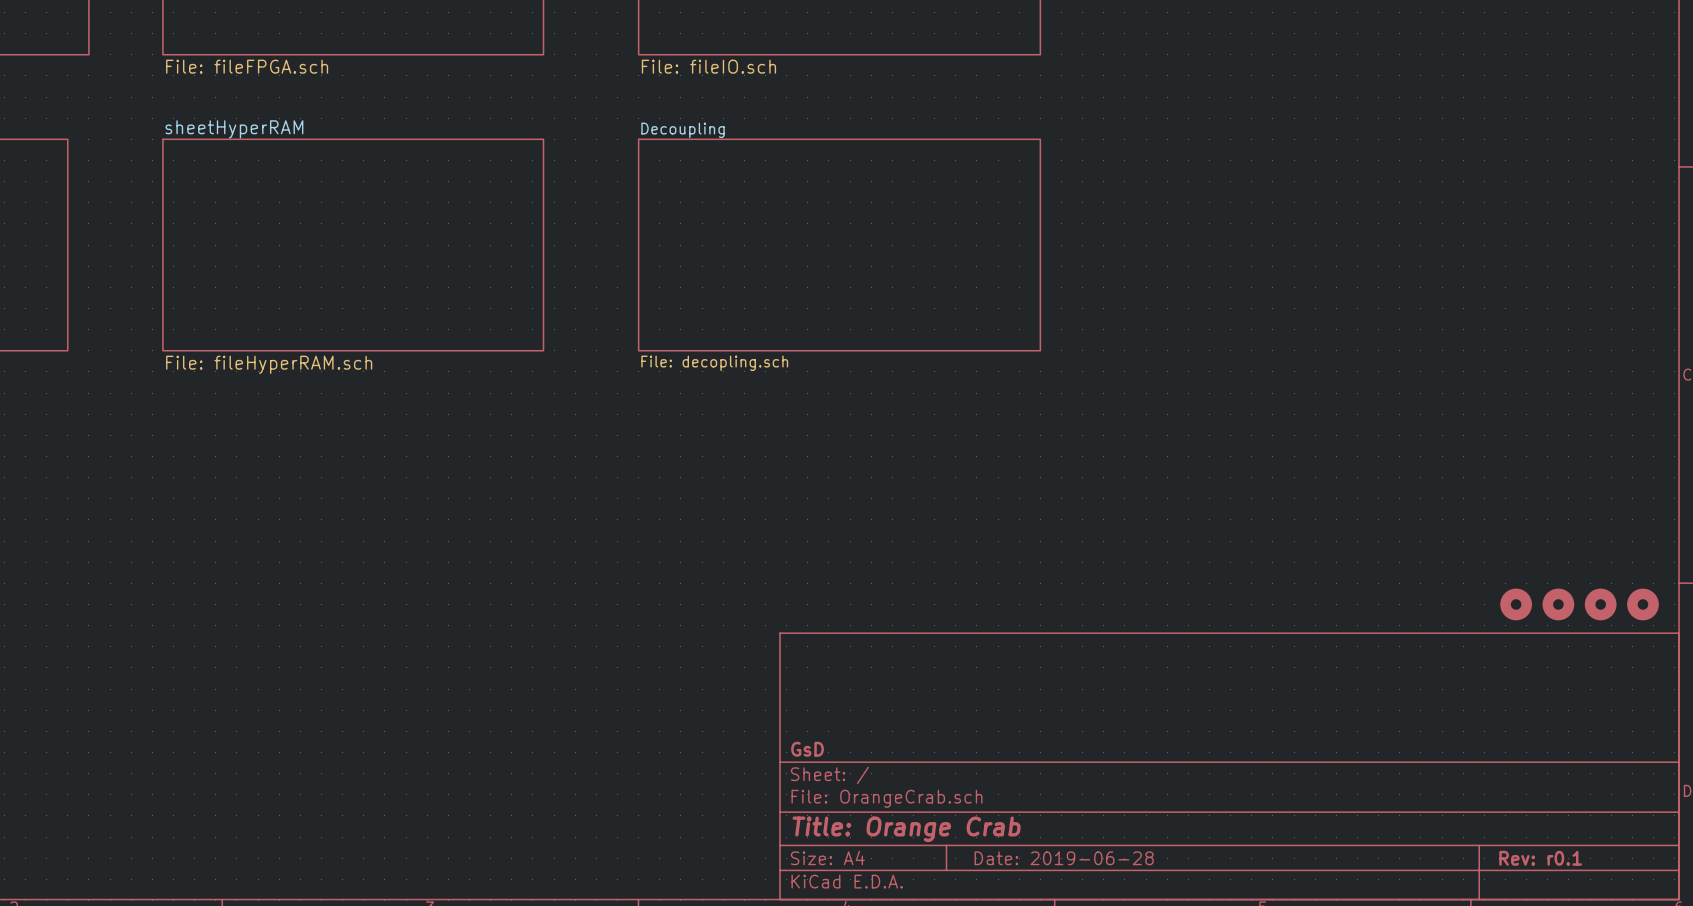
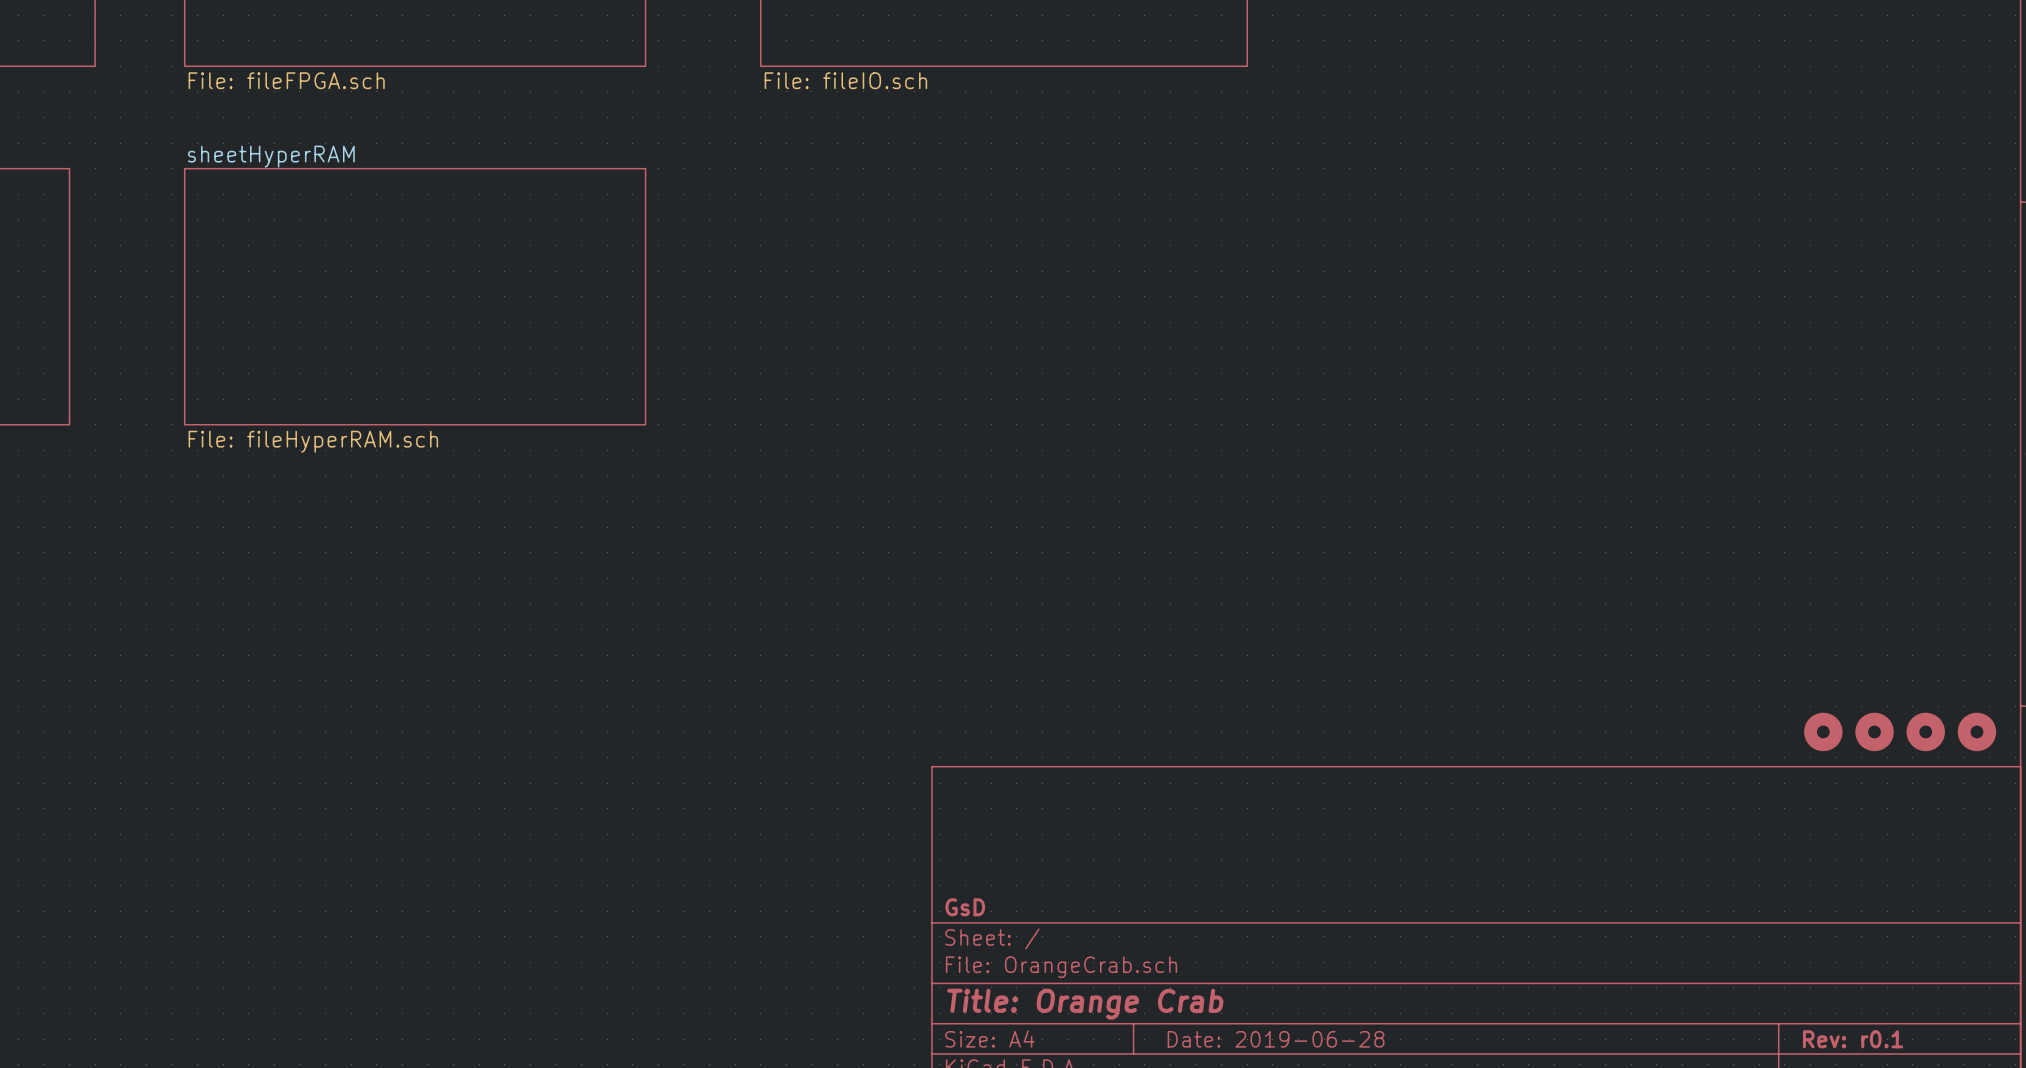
sheet Decoupling: File: decopling.sch (839, 245) -> none

